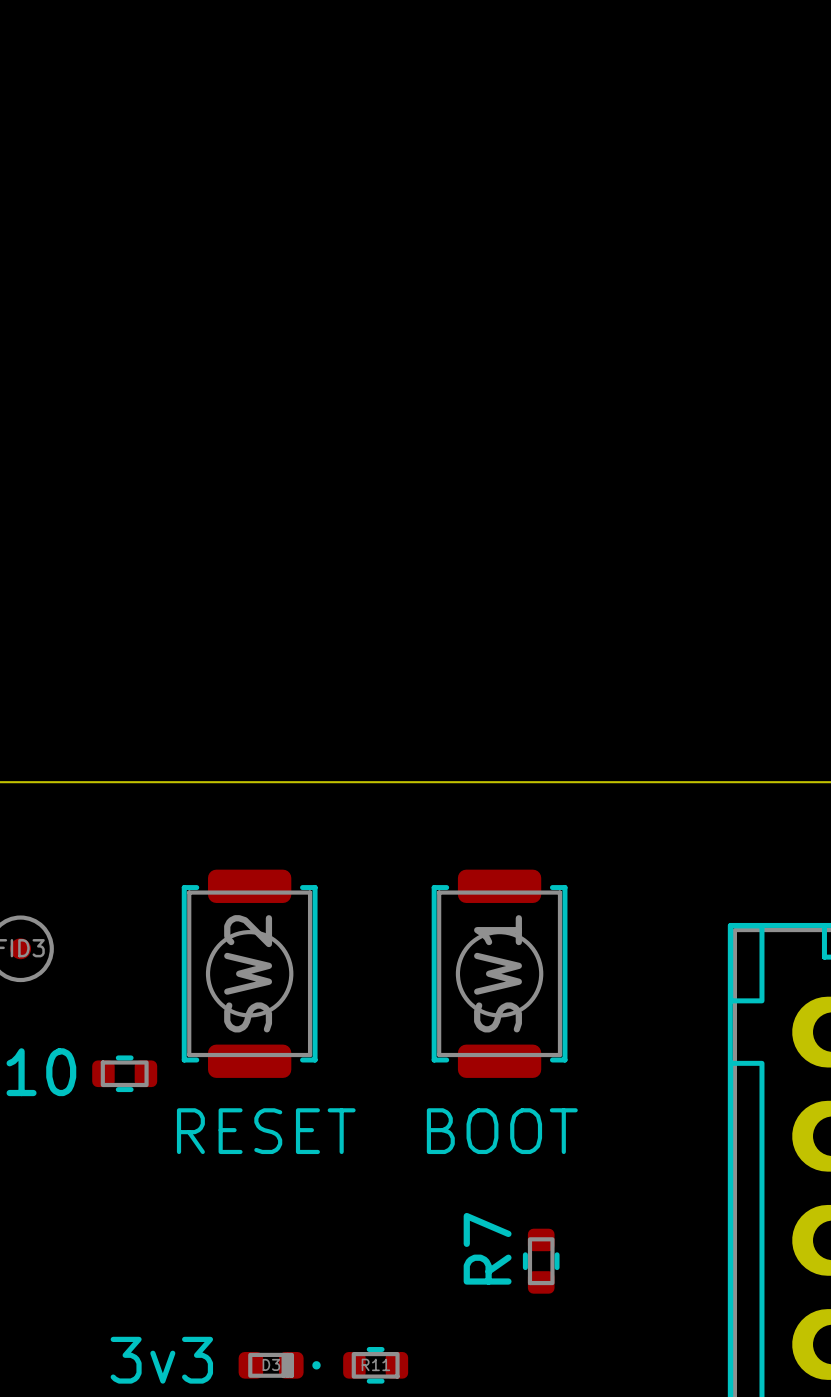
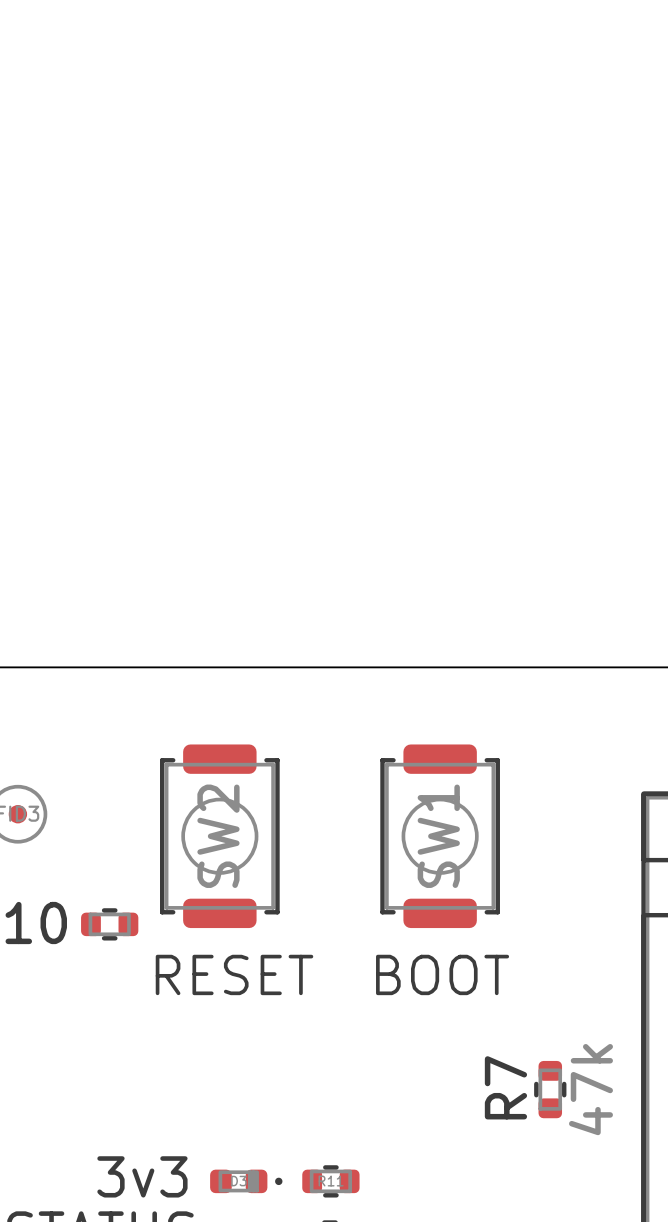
R7 name position: R7 (487, 1248) -> R7 (505, 1087)
R7 position: (541, 1261) -> (550, 1089)
R7 value: none -> 47k (590, 1089)

